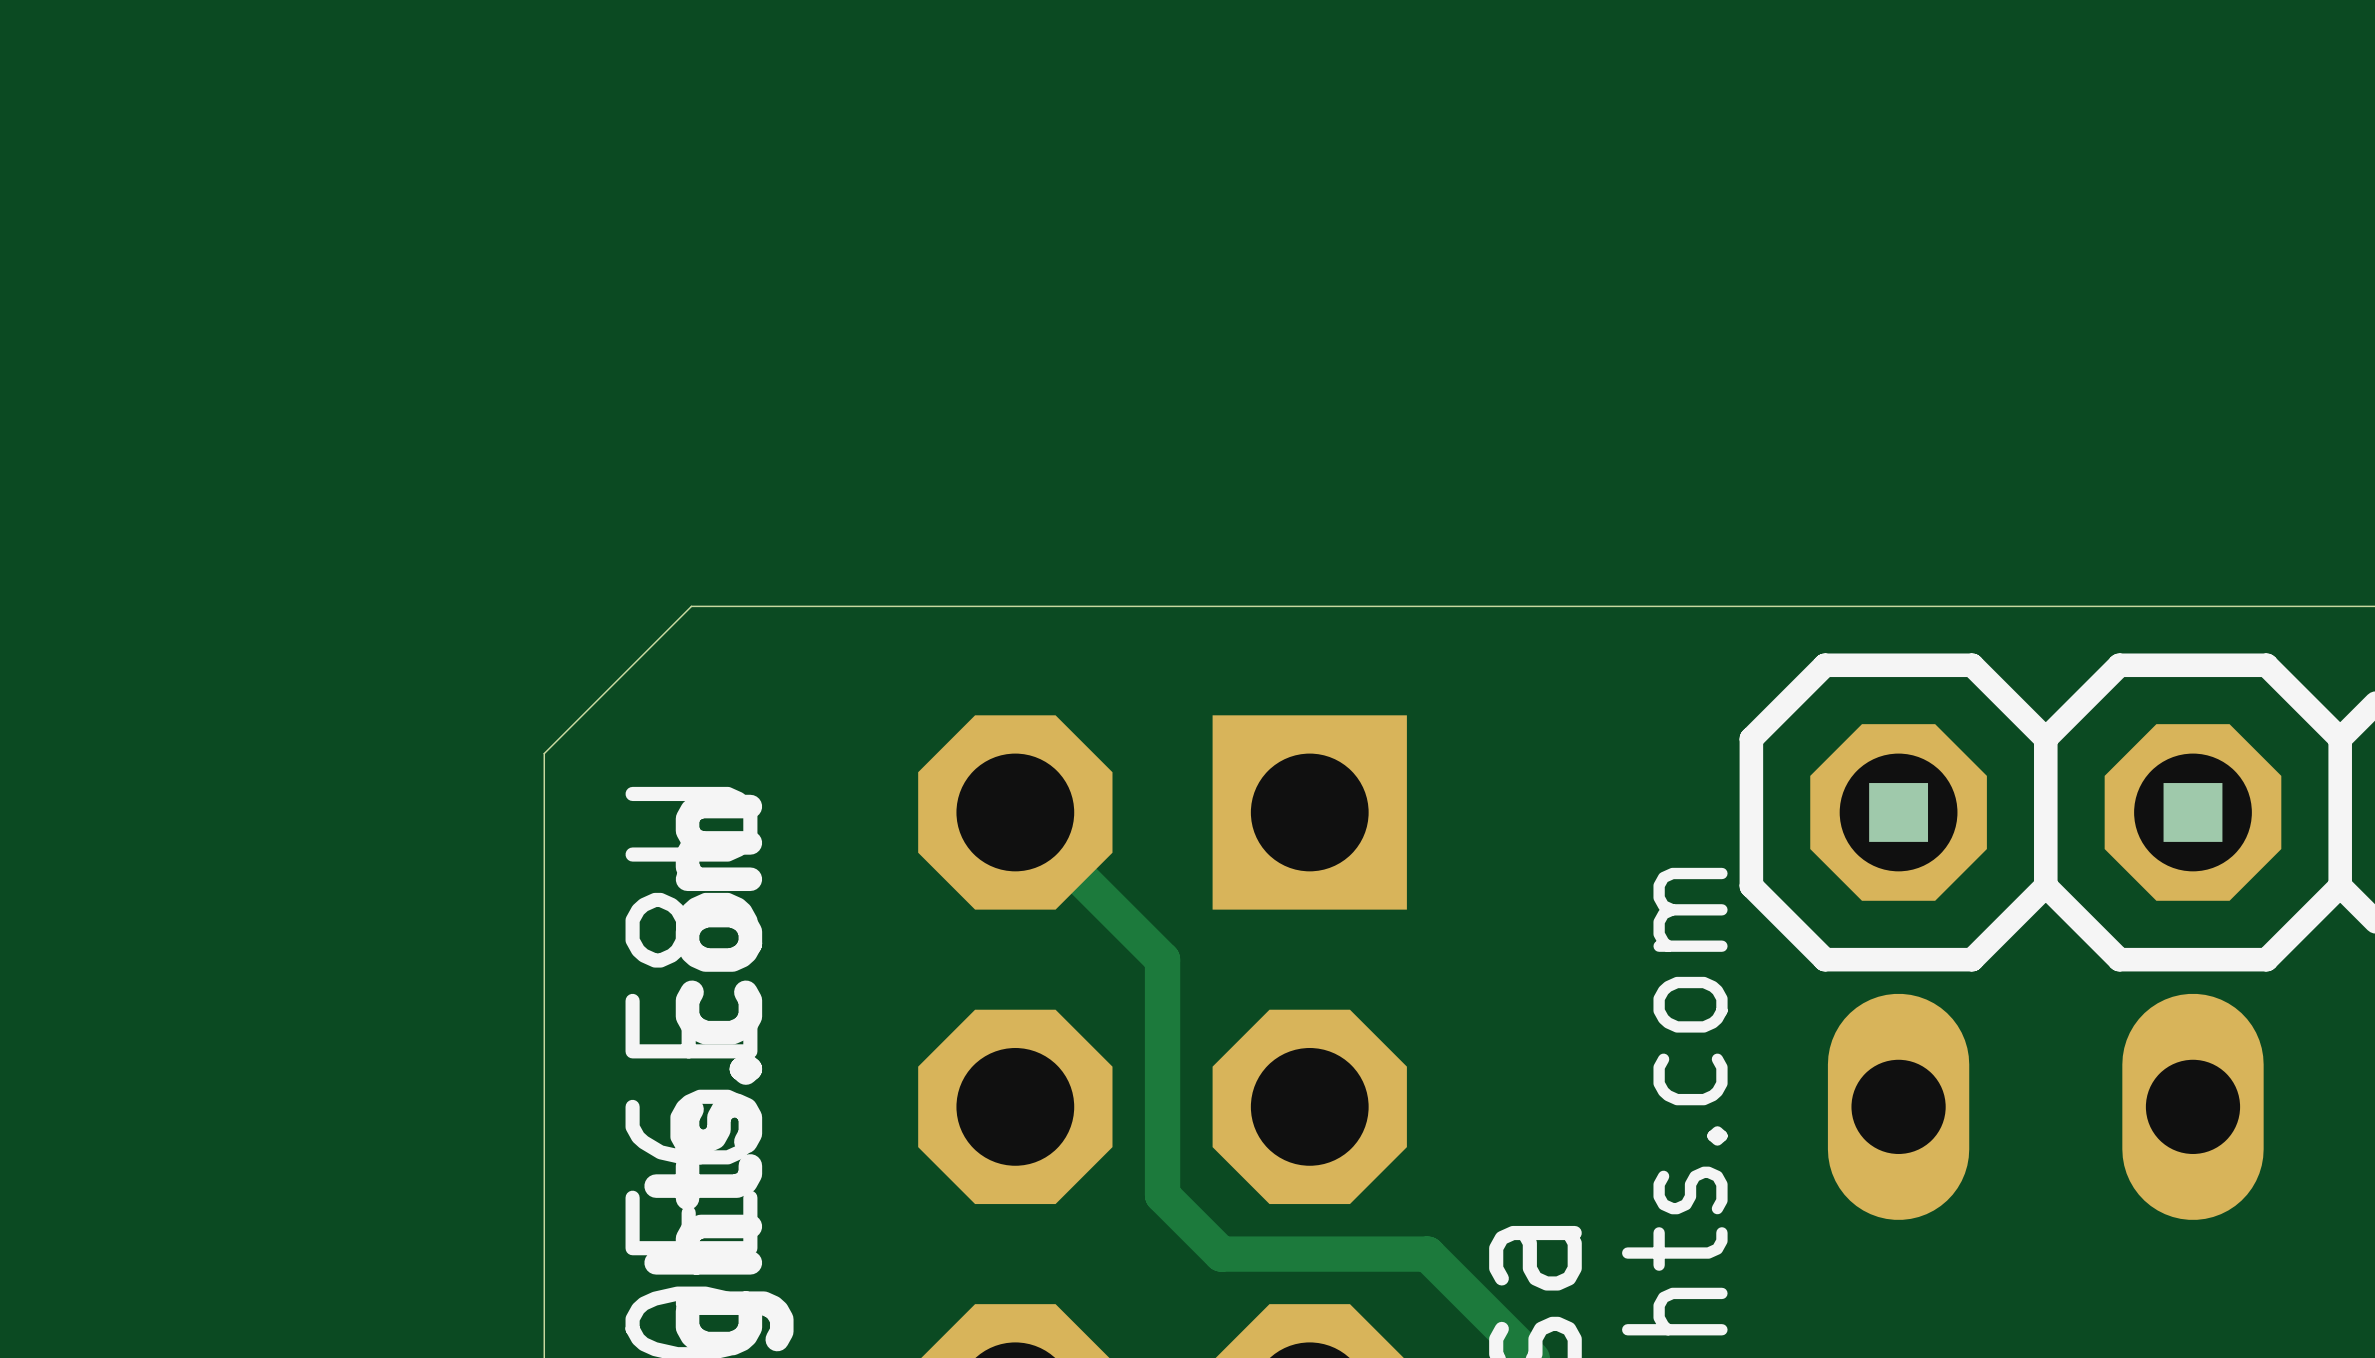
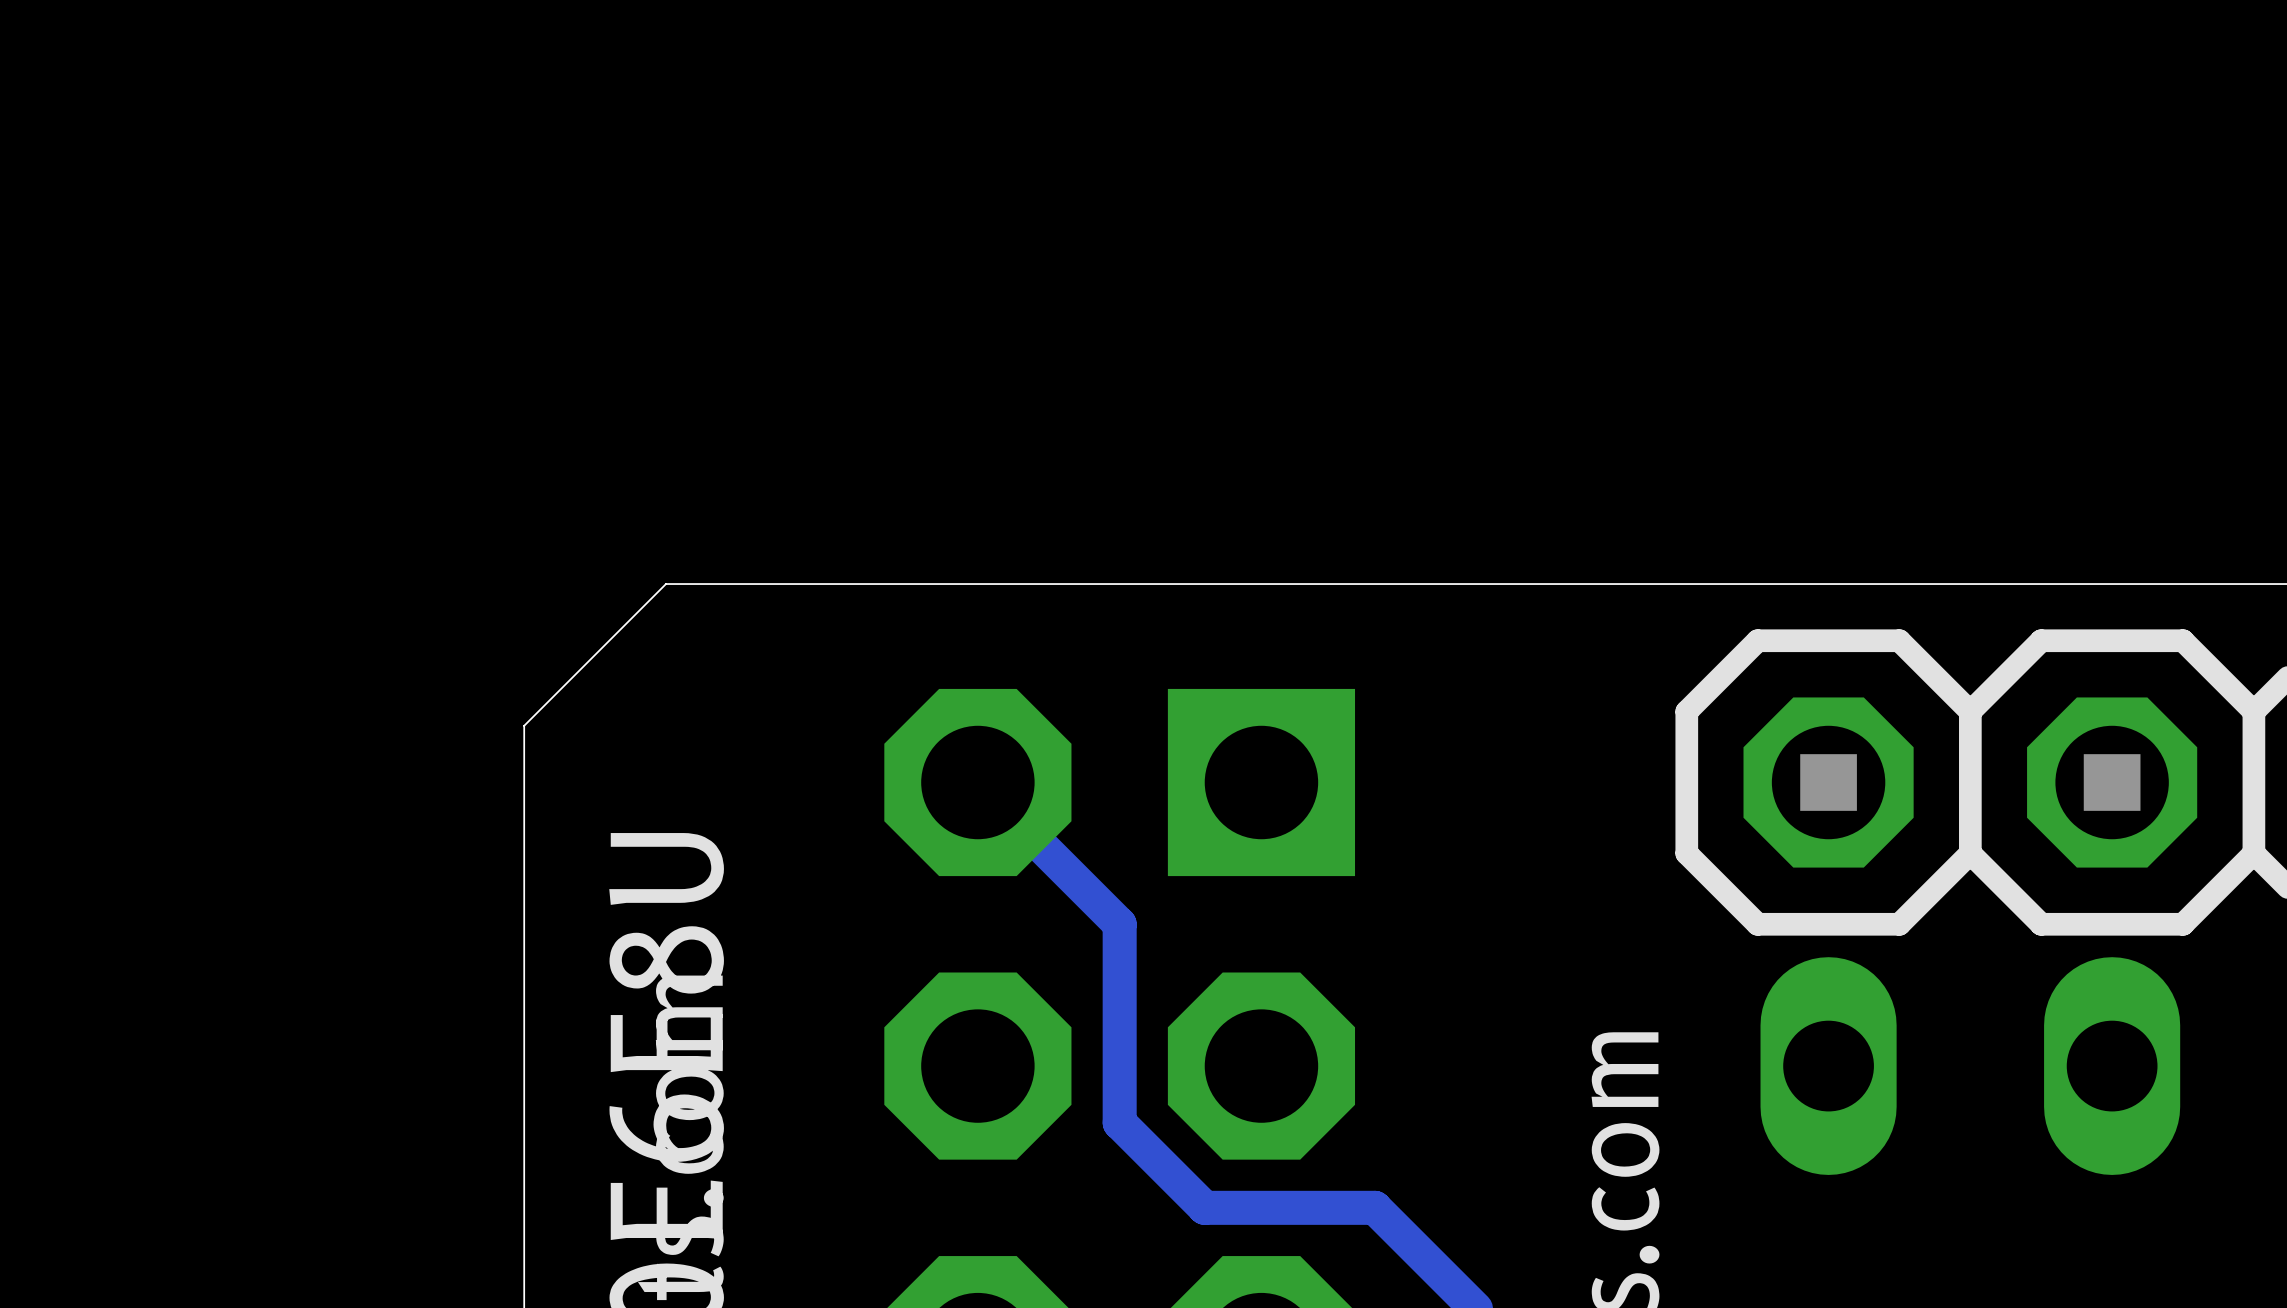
track: (1162, 1165) (1162, 1195) (1221, 1254) (1250, 1254) -> (1119, 1122) (1204, 1207)

